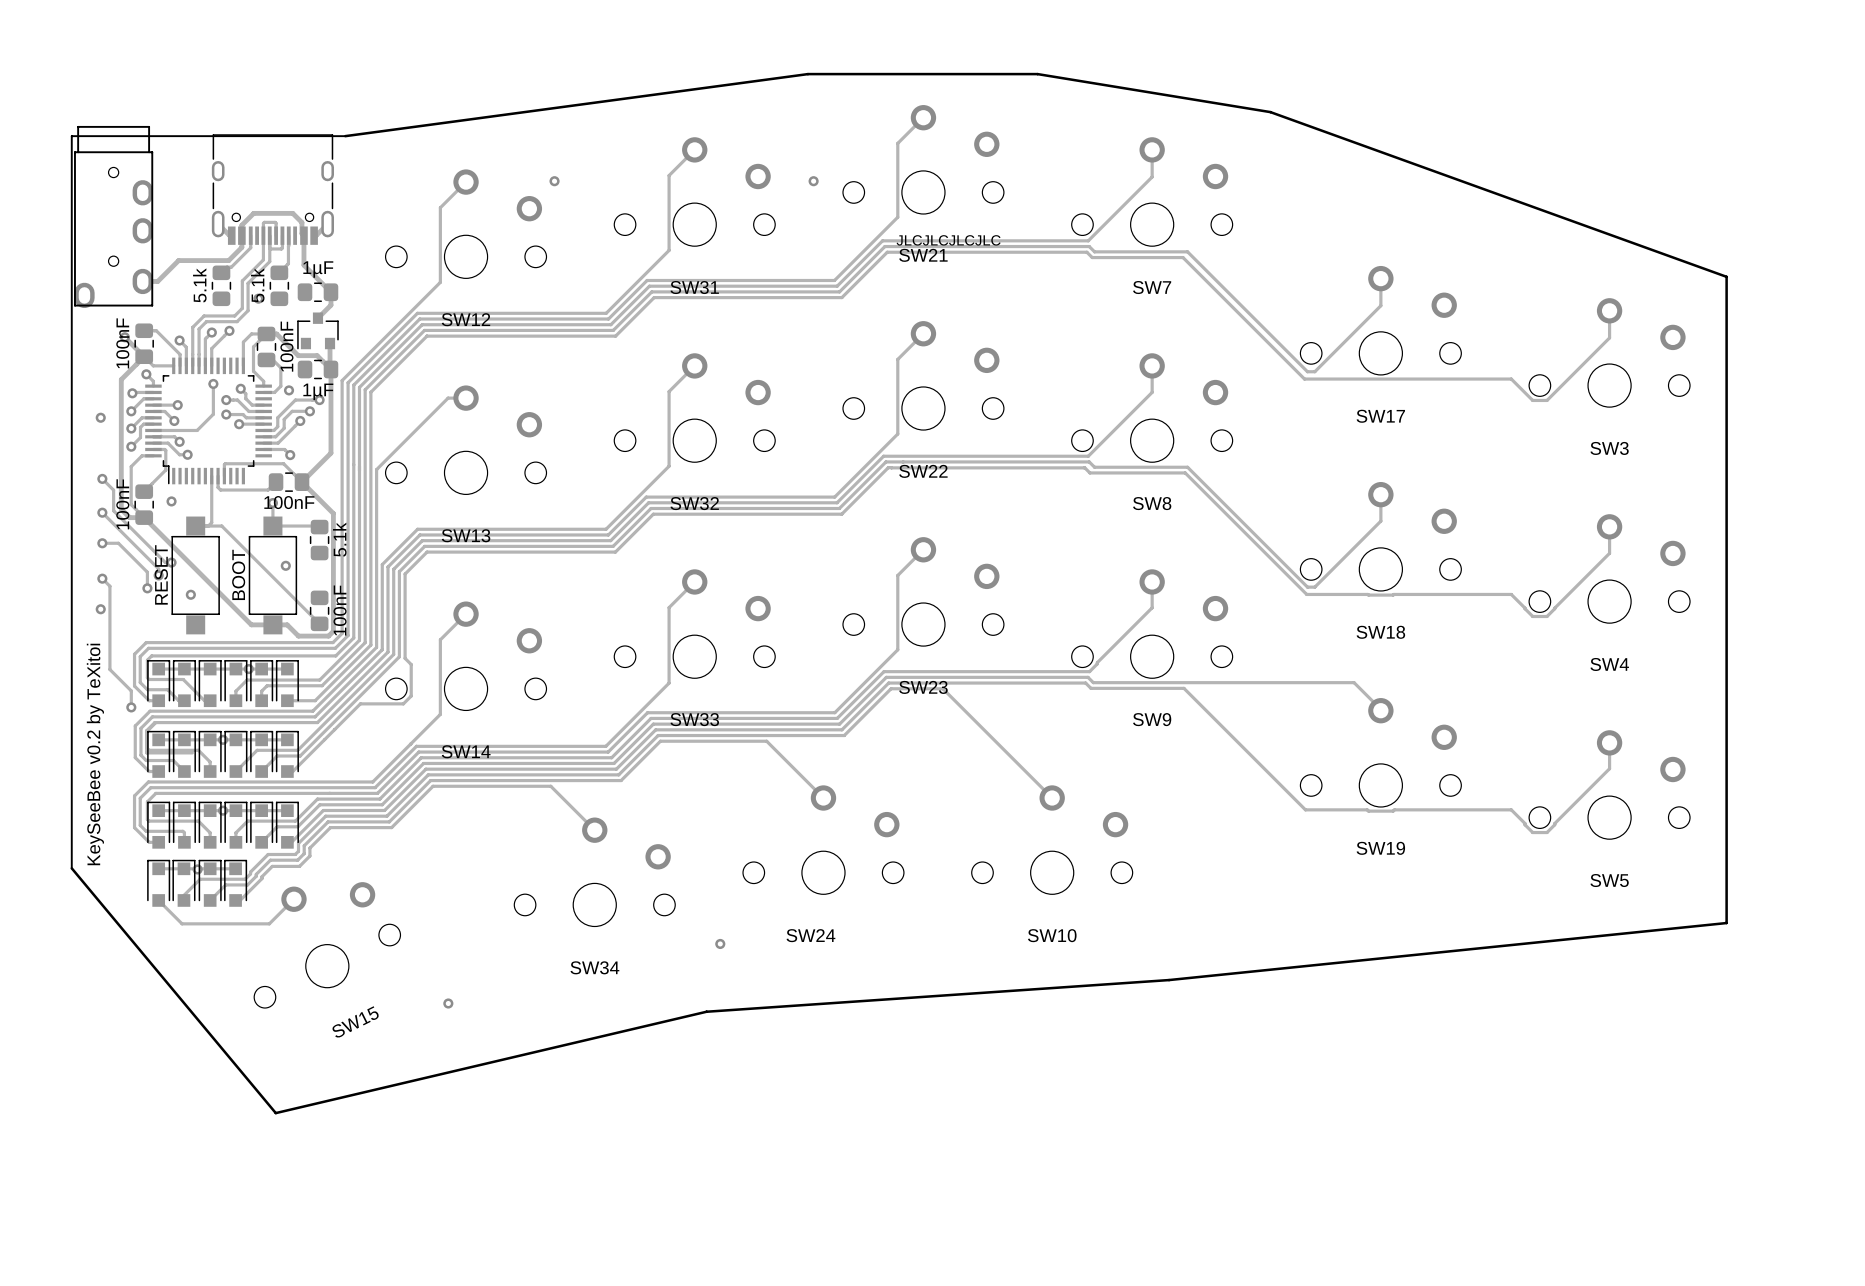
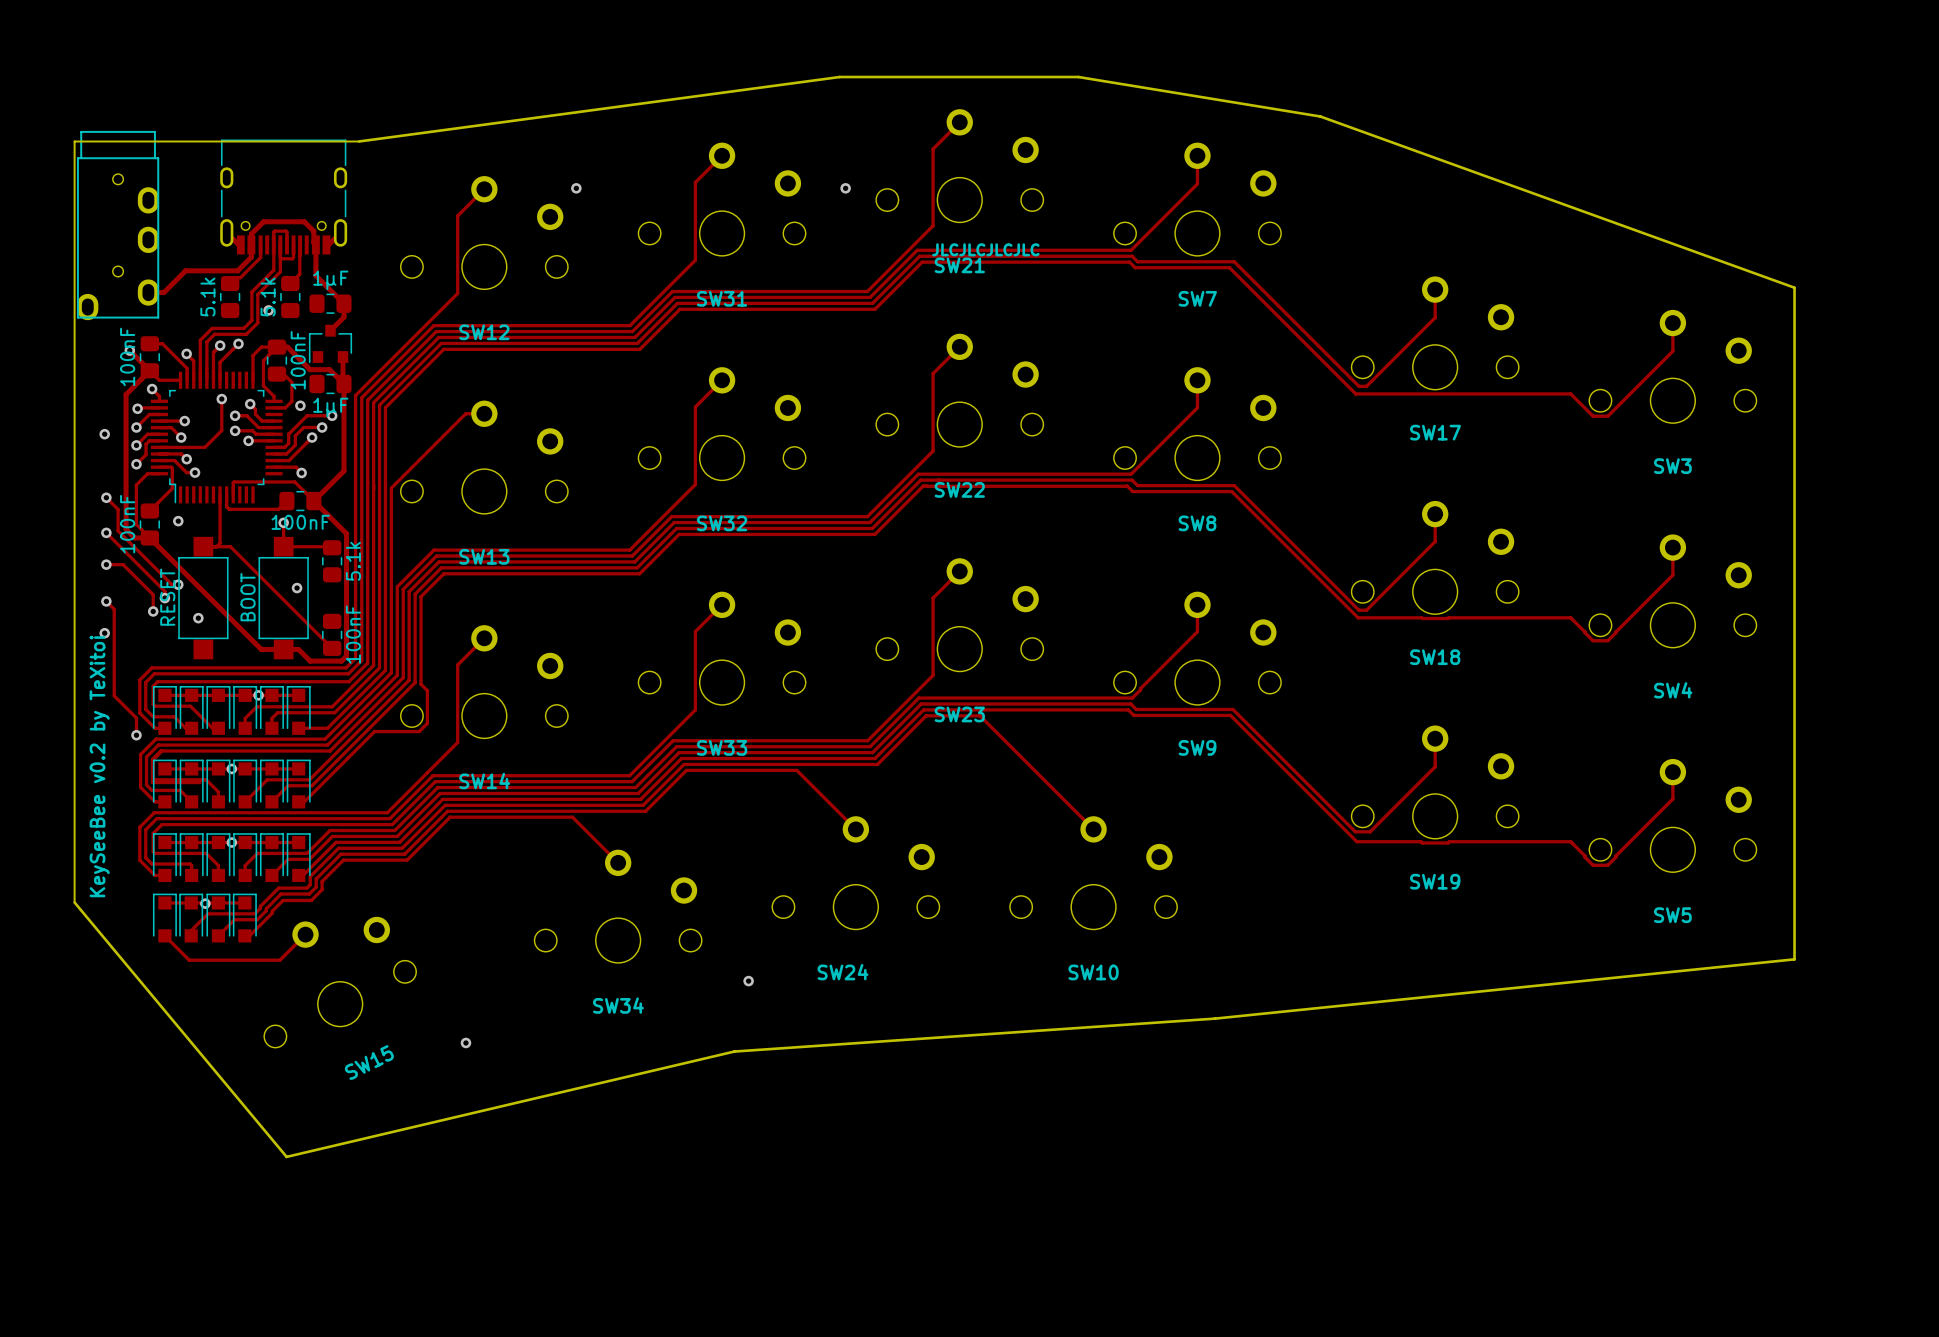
track: (1186, 682) (1354, 682) (1380, 709) -> (1233, 709) (1355, 831) (1370, 831) (1435, 766) (1435, 737)

